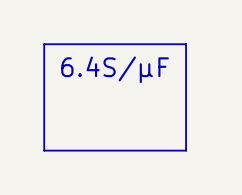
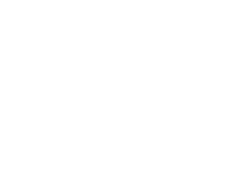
line: (44, 44) (186, 44) (186, 150) (44, 150) (44, 44) -> none
text: 6.4S/µF (115, 69) -> none

